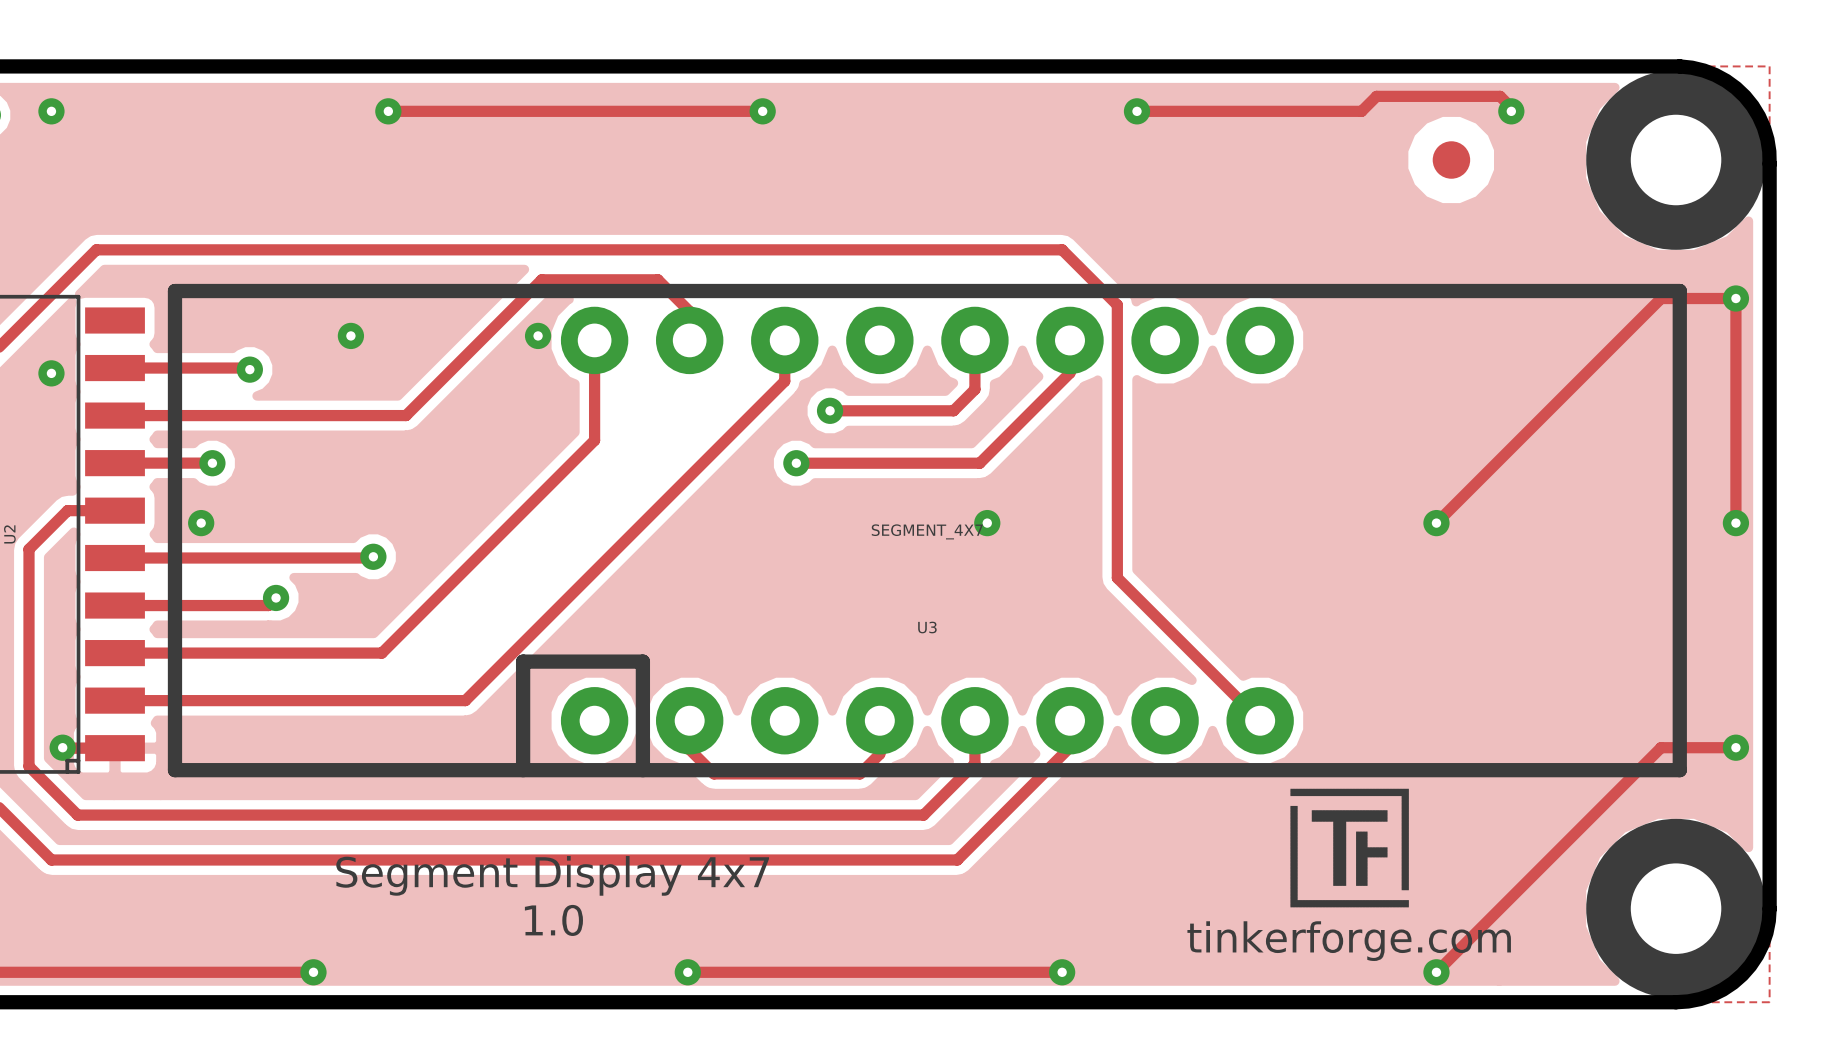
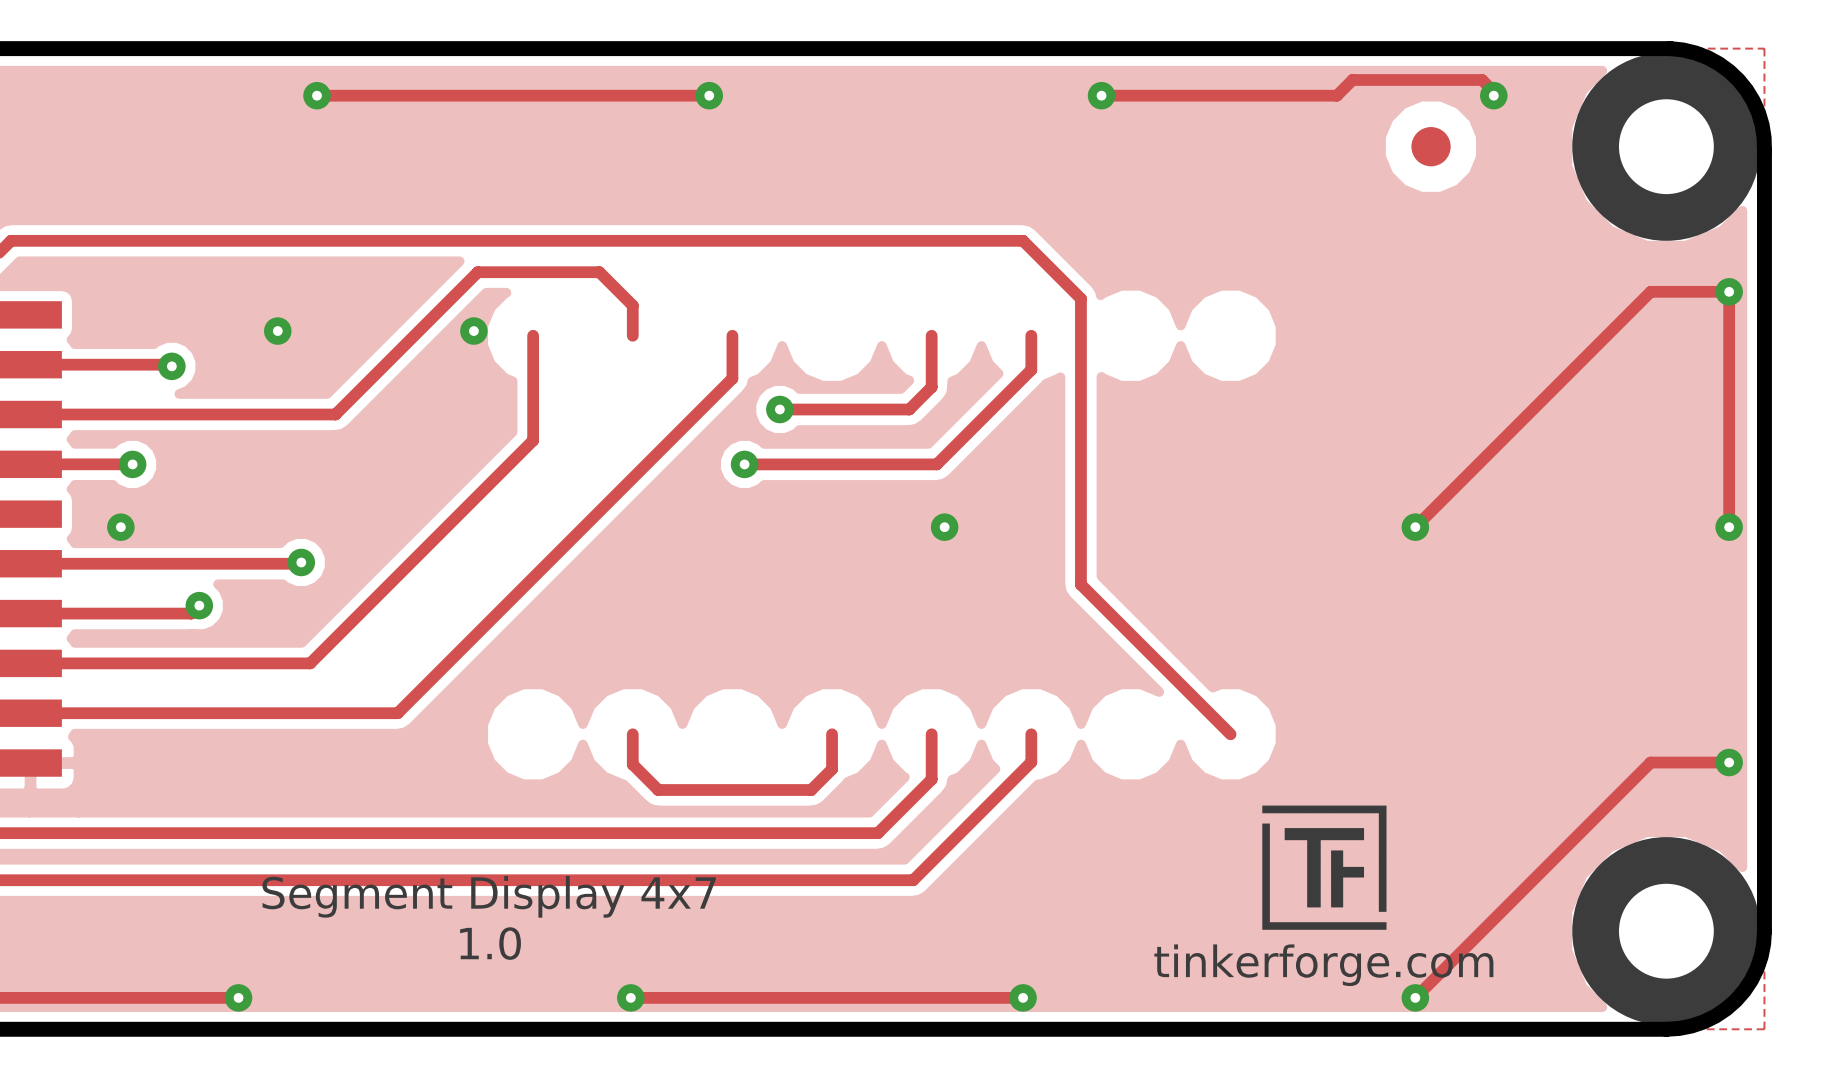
U3: SEGMENT_4X7 (927, 530) -> none

